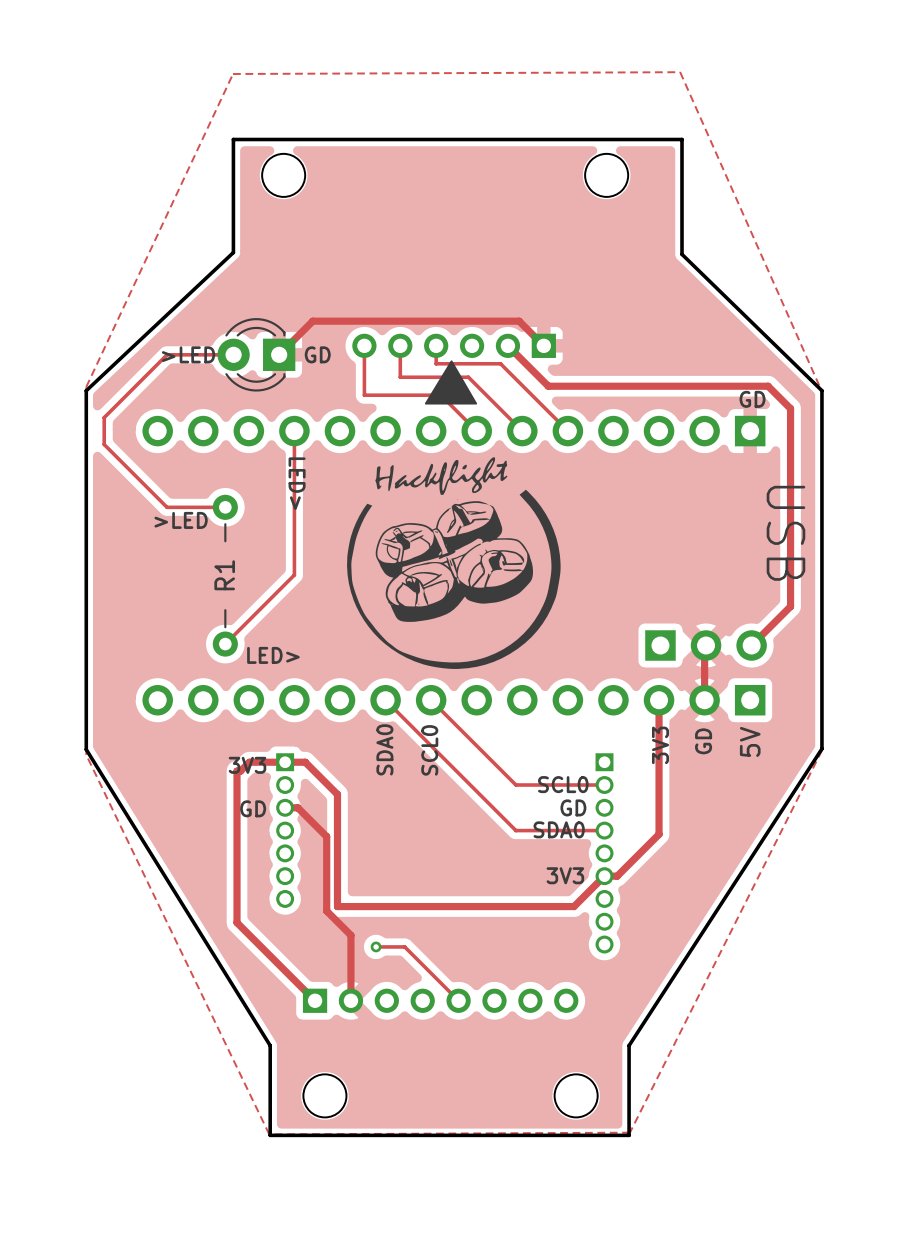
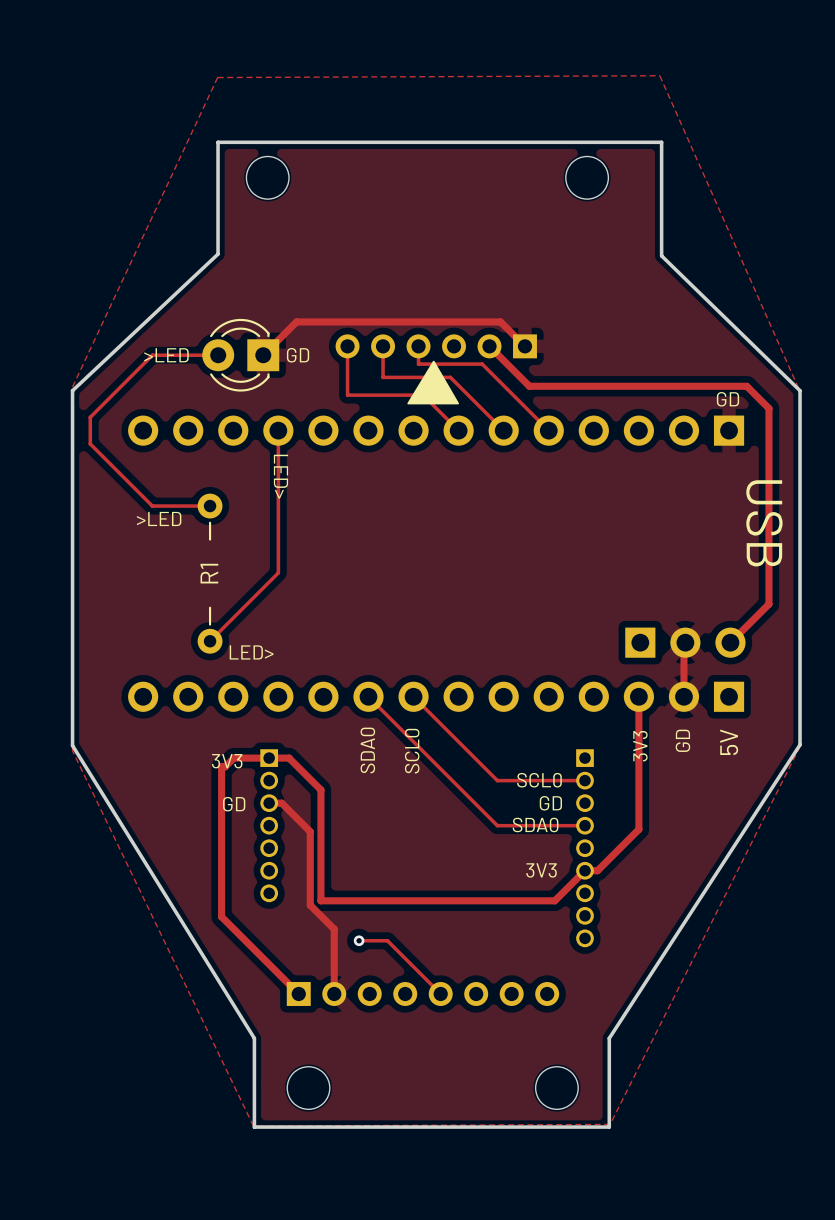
drawing: [347, 457, 561, 669] -> none

